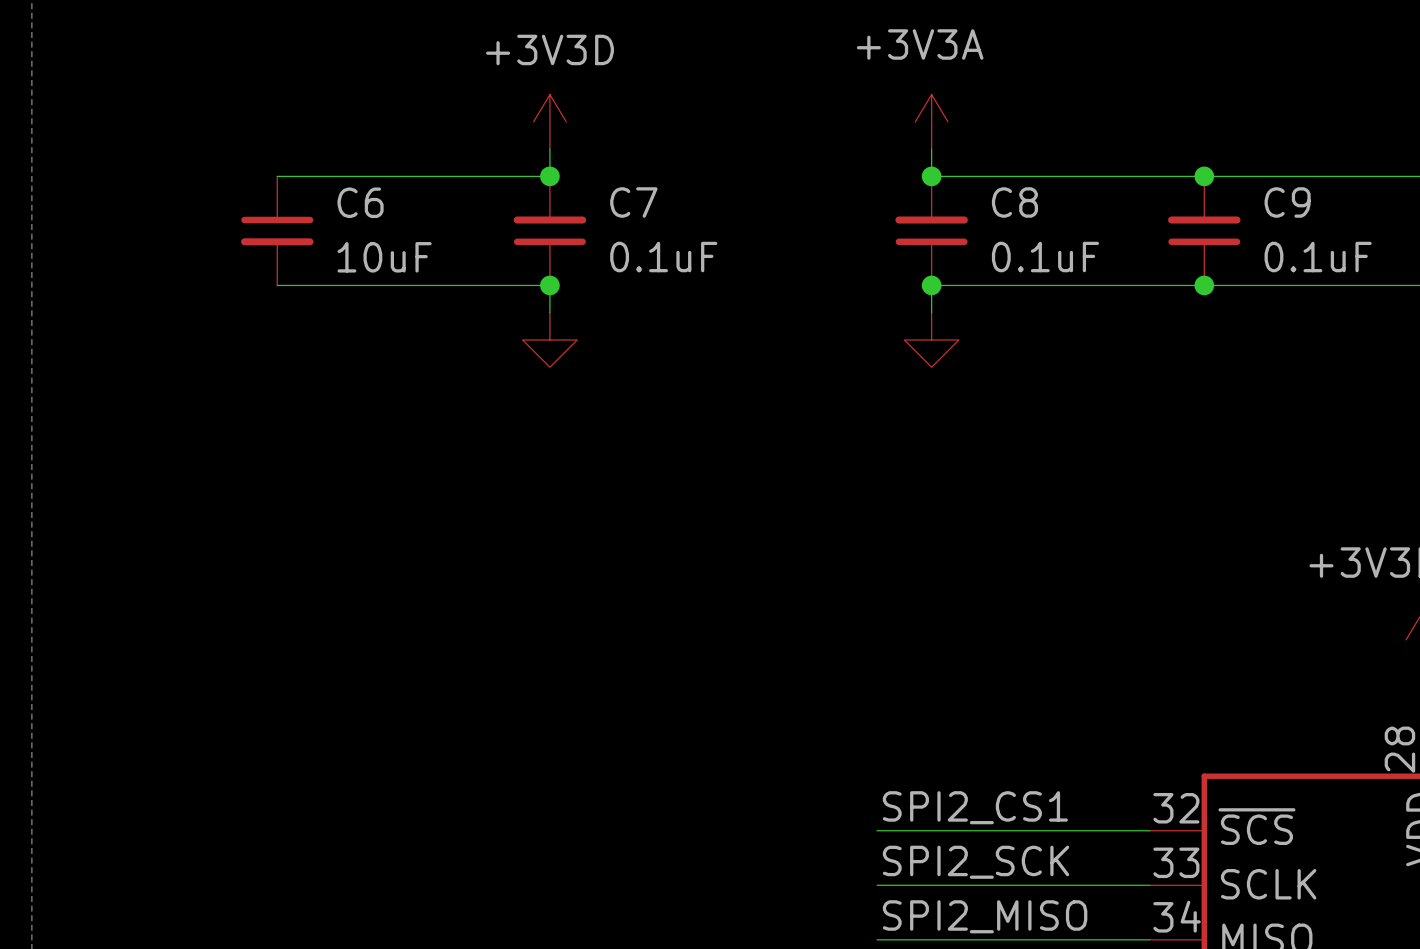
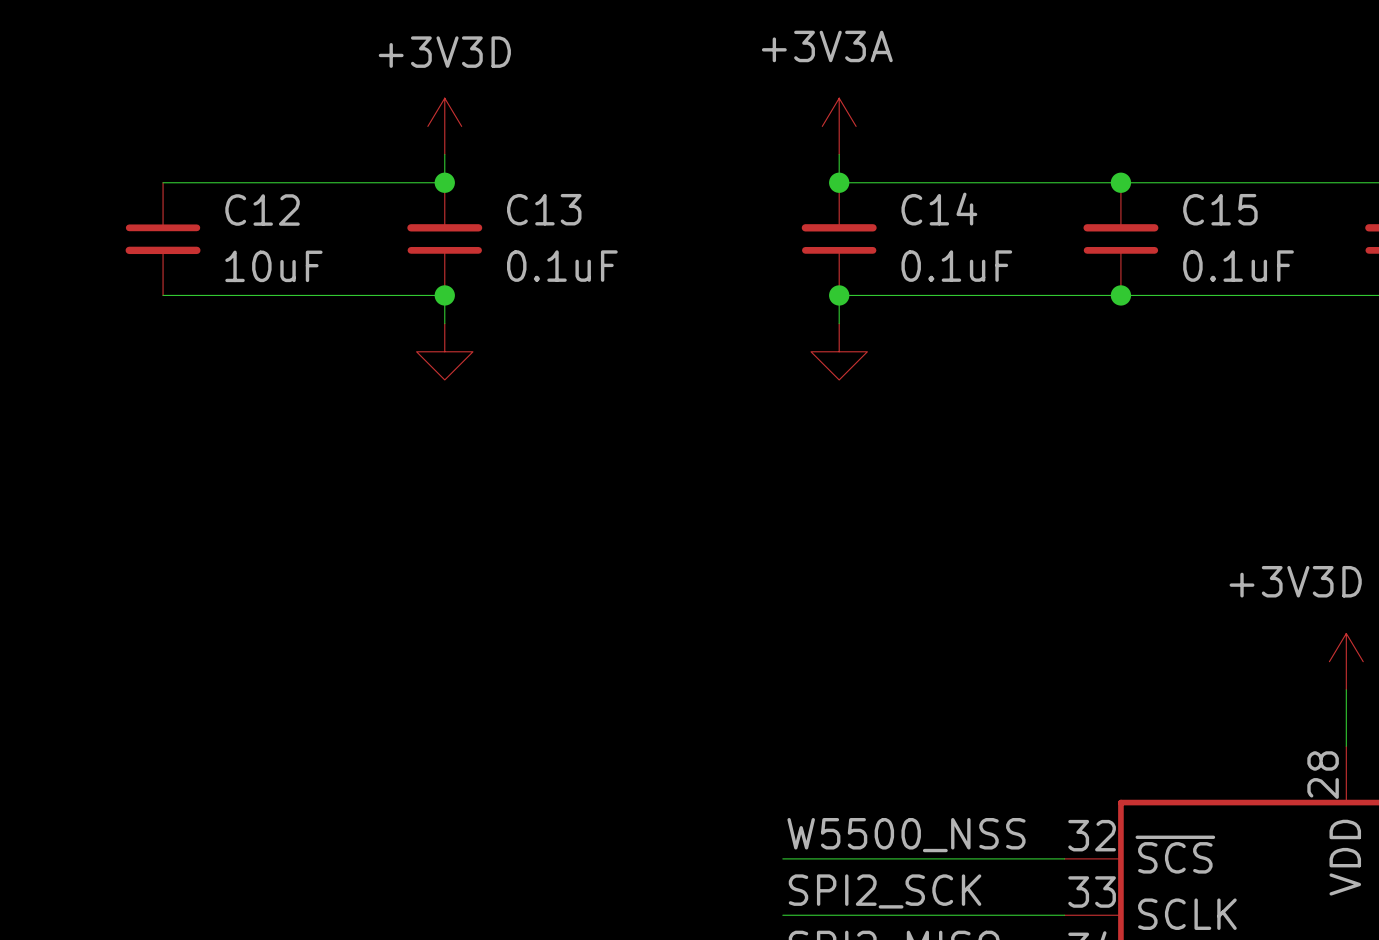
C6 name: C6 (360, 202) -> C12 (262, 210)
C7 name: C7 (633, 202) -> C13 (544, 209)
C8 name: C8 (1014, 202) -> C14 (939, 209)
C9 name: C9 (1287, 202) -> C15 (1220, 209)
label: SPI2_CS1 (975, 807) -> W5500_NSS (906, 835)

